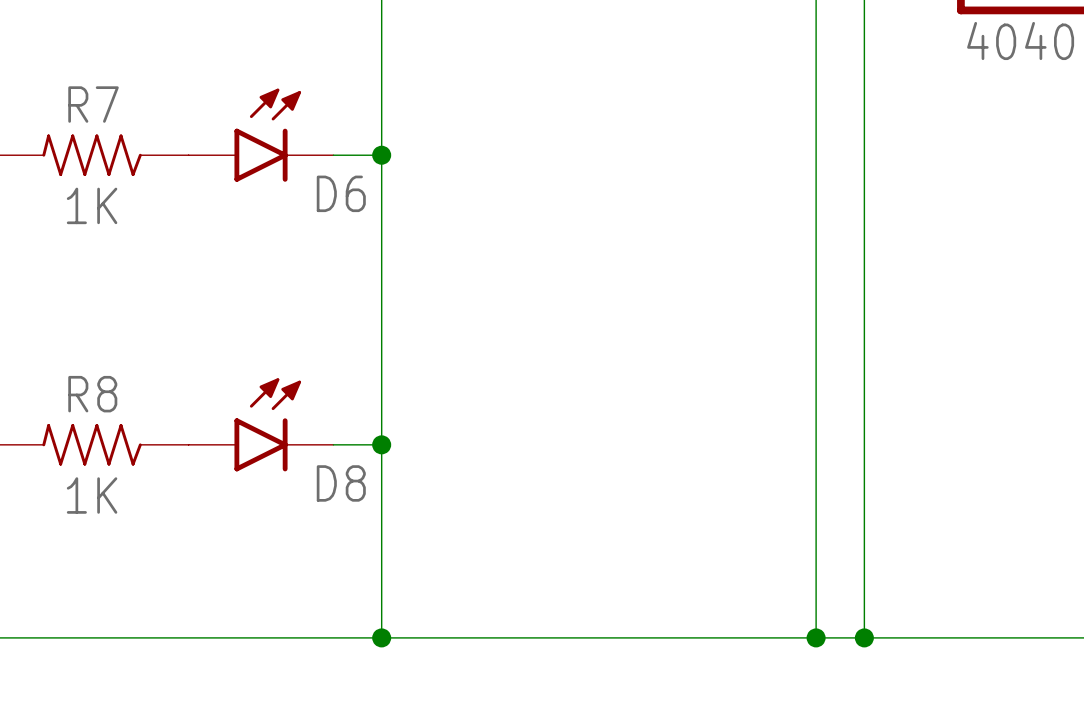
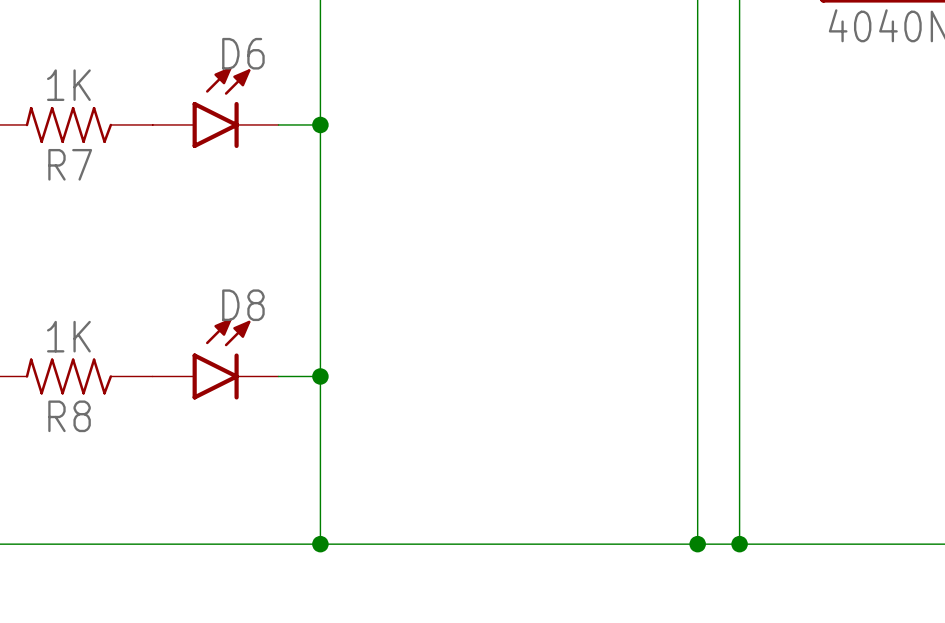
R7 name position: R7 (93, 104) -> R7 (70, 164)
D6 name position: D6 (341, 193) -> D6 (243, 53)
R7 value position: 1K (92, 205) -> 1K (68, 85)
R8 name position: R8 (92, 394) -> R8 (69, 416)
D8 name position: D8 (341, 483) -> D8 (243, 305)
R8 value position: 1K (92, 495) -> 1K (68, 336)

